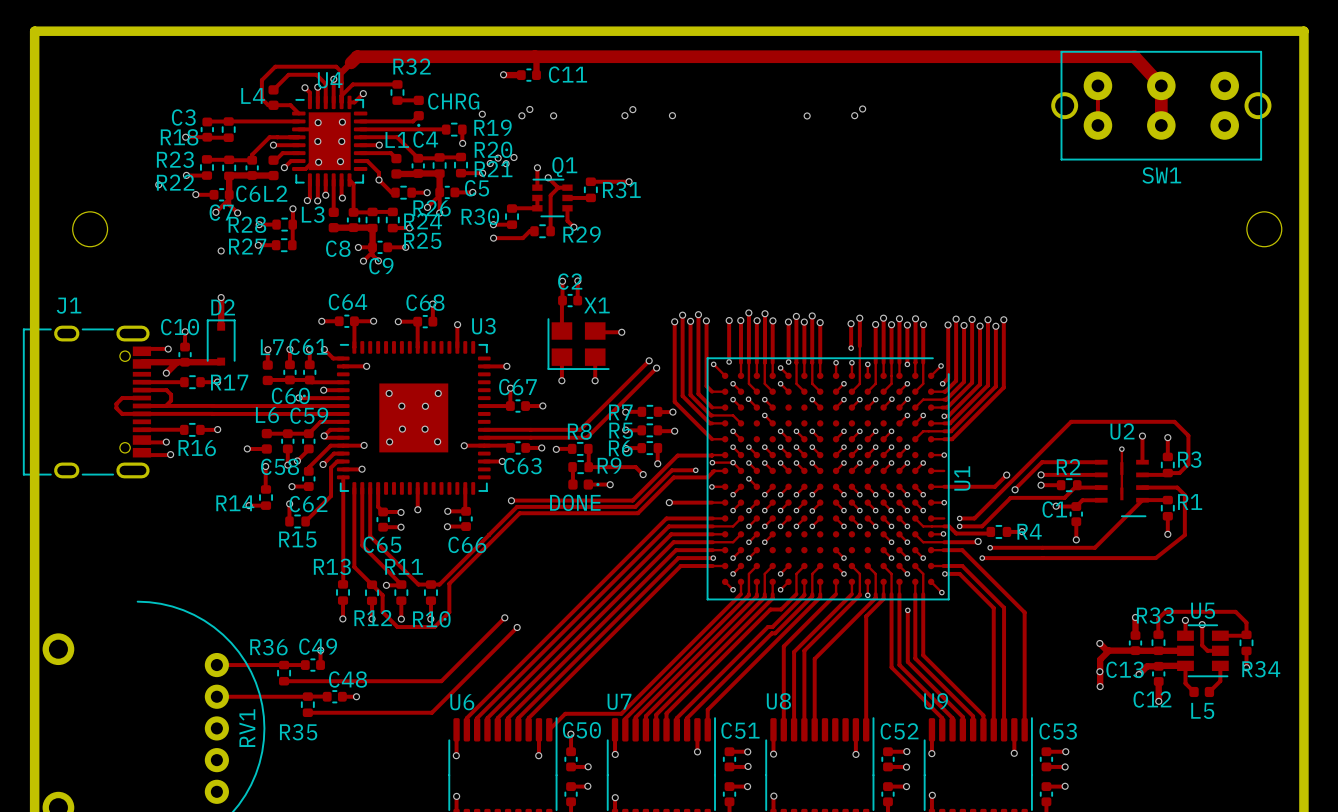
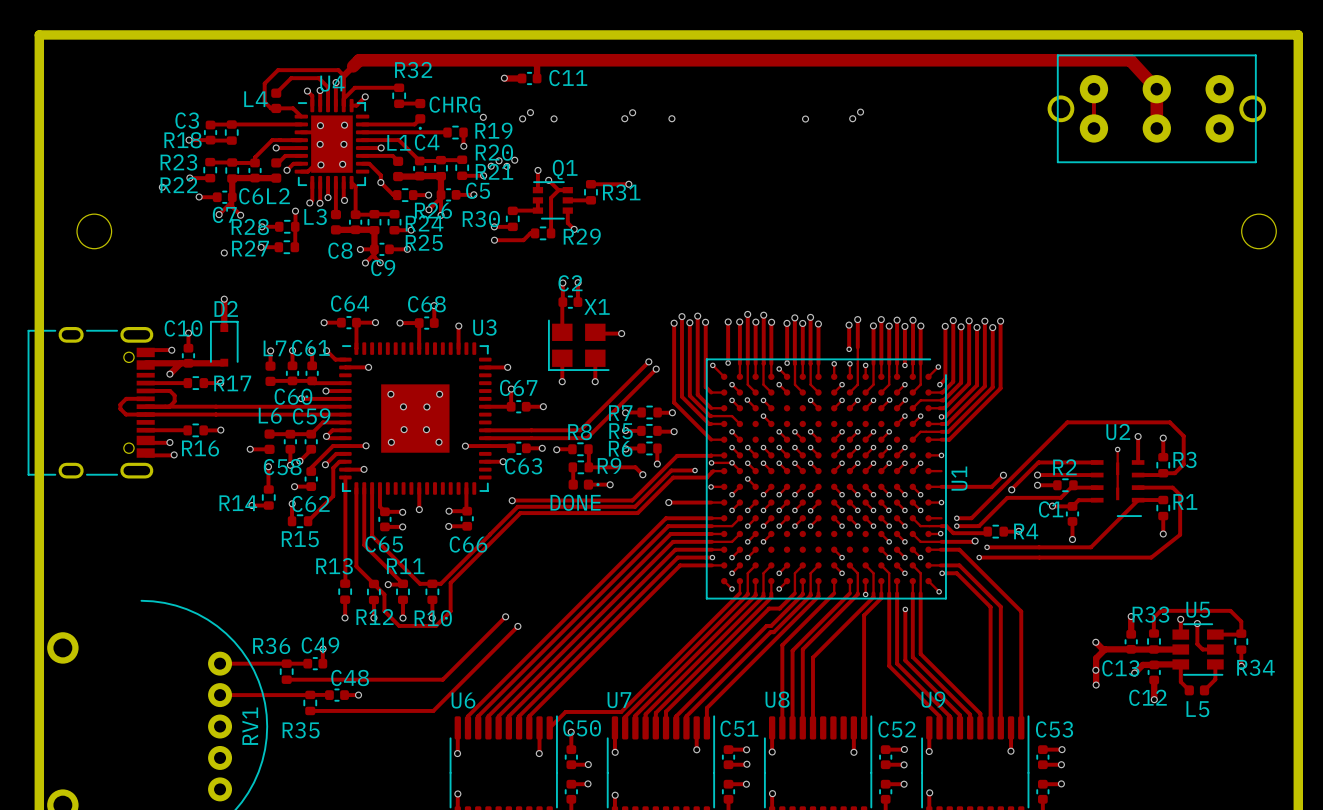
SW1 name: SW1 (1161, 175) -> none
J1 name: J1 (69, 305) -> none

